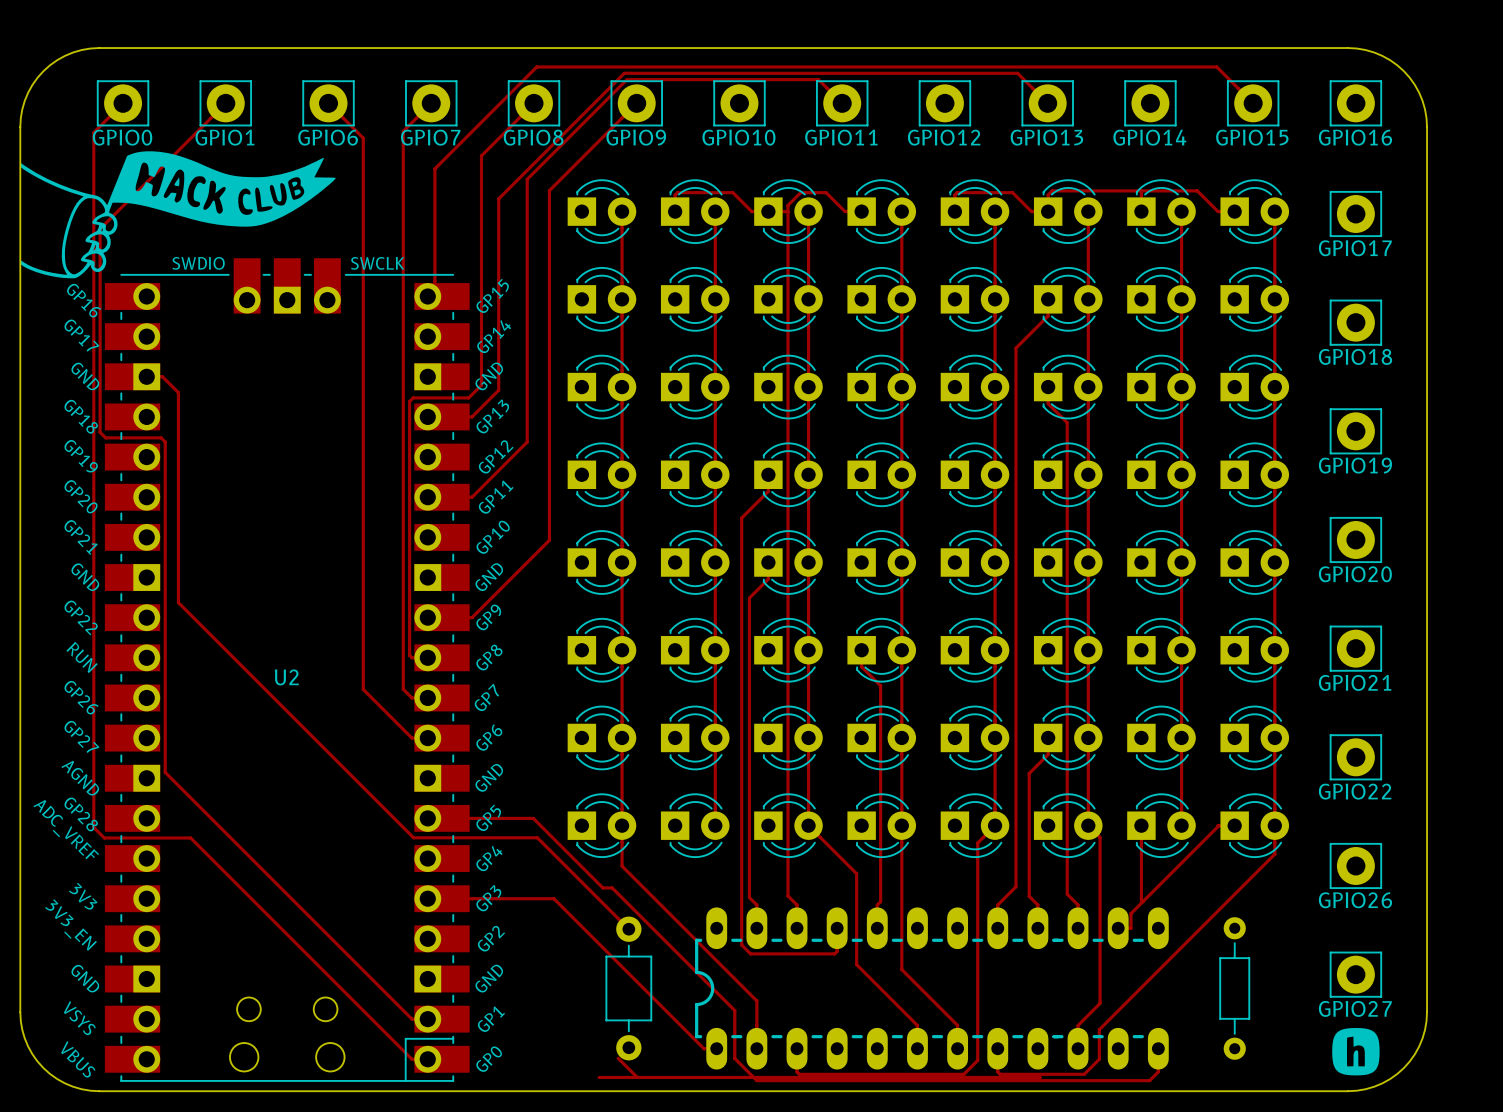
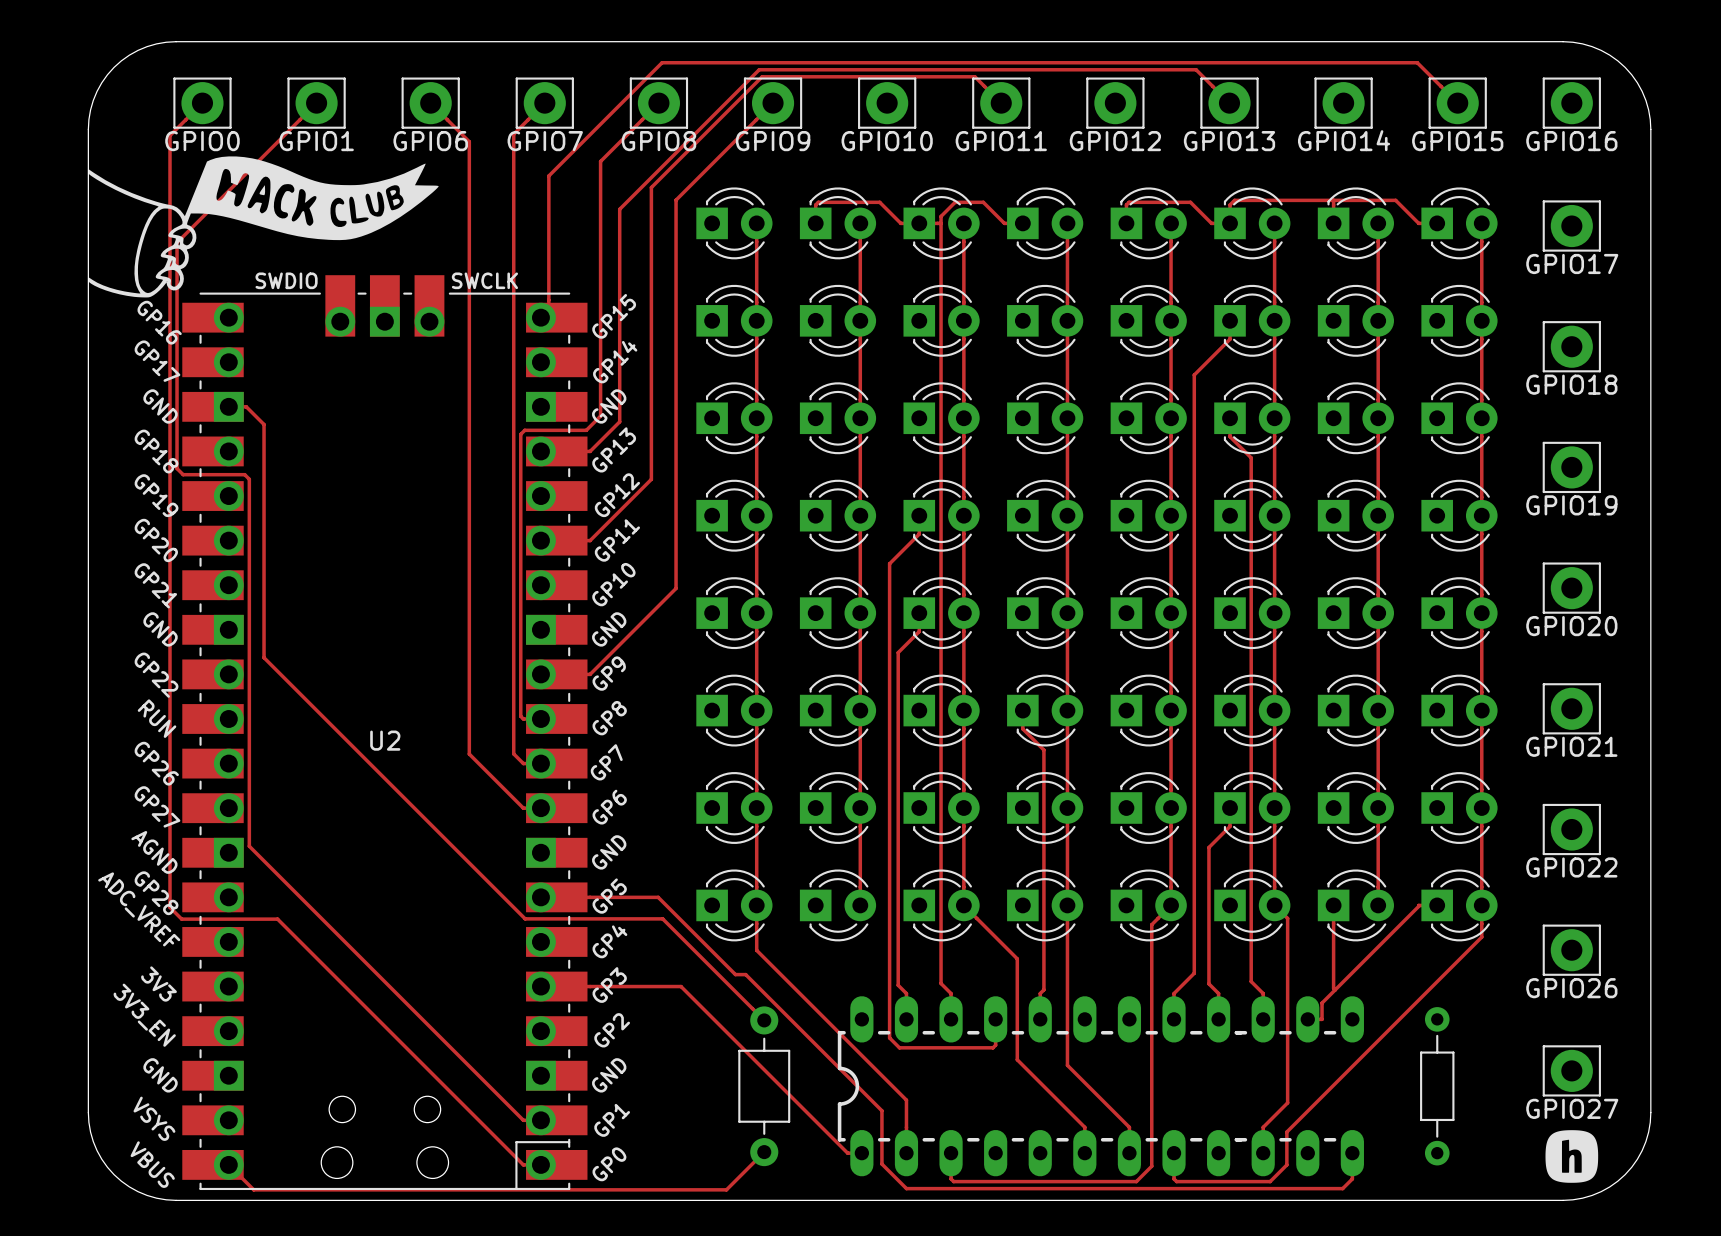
track: none -> (764, 1152) (726, 1189) (253, 1189) (228, 1164)
track: (618, 1058) (637, 1077) -> none
track: (599, 1077) (1040, 1077) -> none

